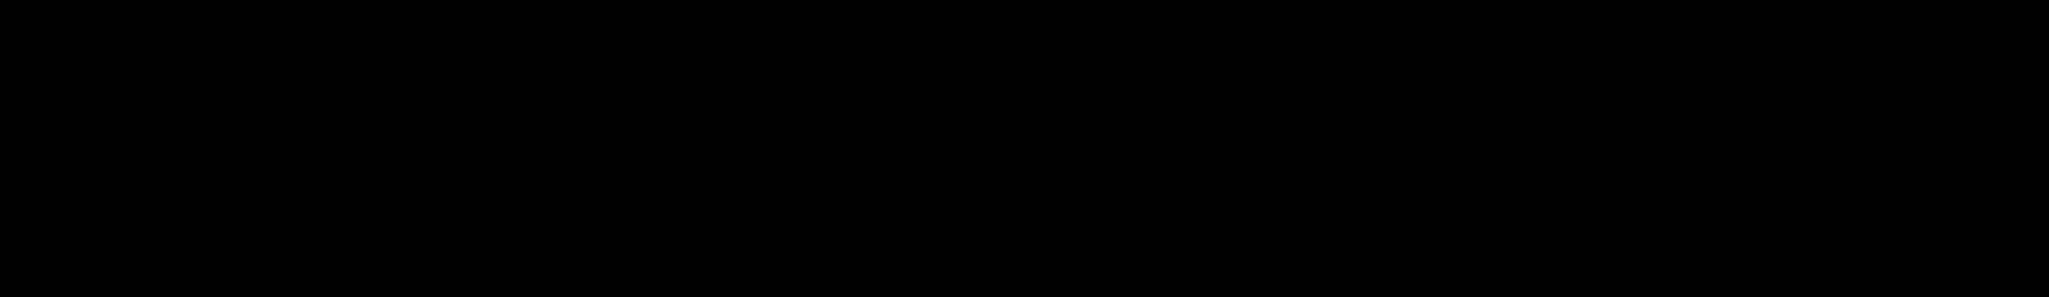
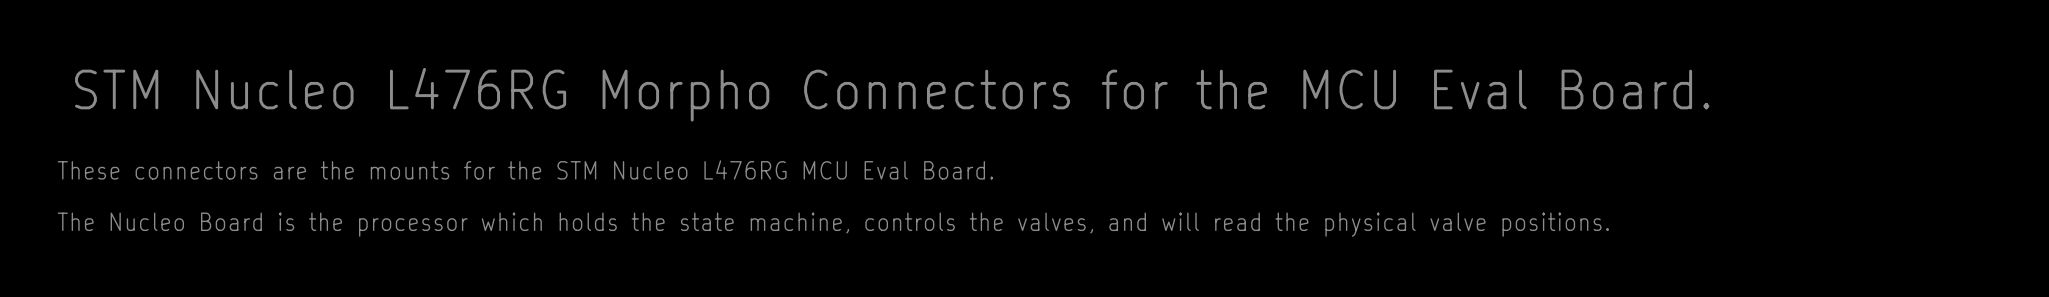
text: none -> STM Nucleo L476RG Morpho Connectors for the MCU Eval Board. (892, 94)
text: none -> These connectors are the mounts for the STM Nucleo L476RG MCU Eval Board. (525, 169)
text: none -> The Nucleo Board is the processor which holds the state machine, controls the valves, and will read the physical valve positions. (833, 224)

